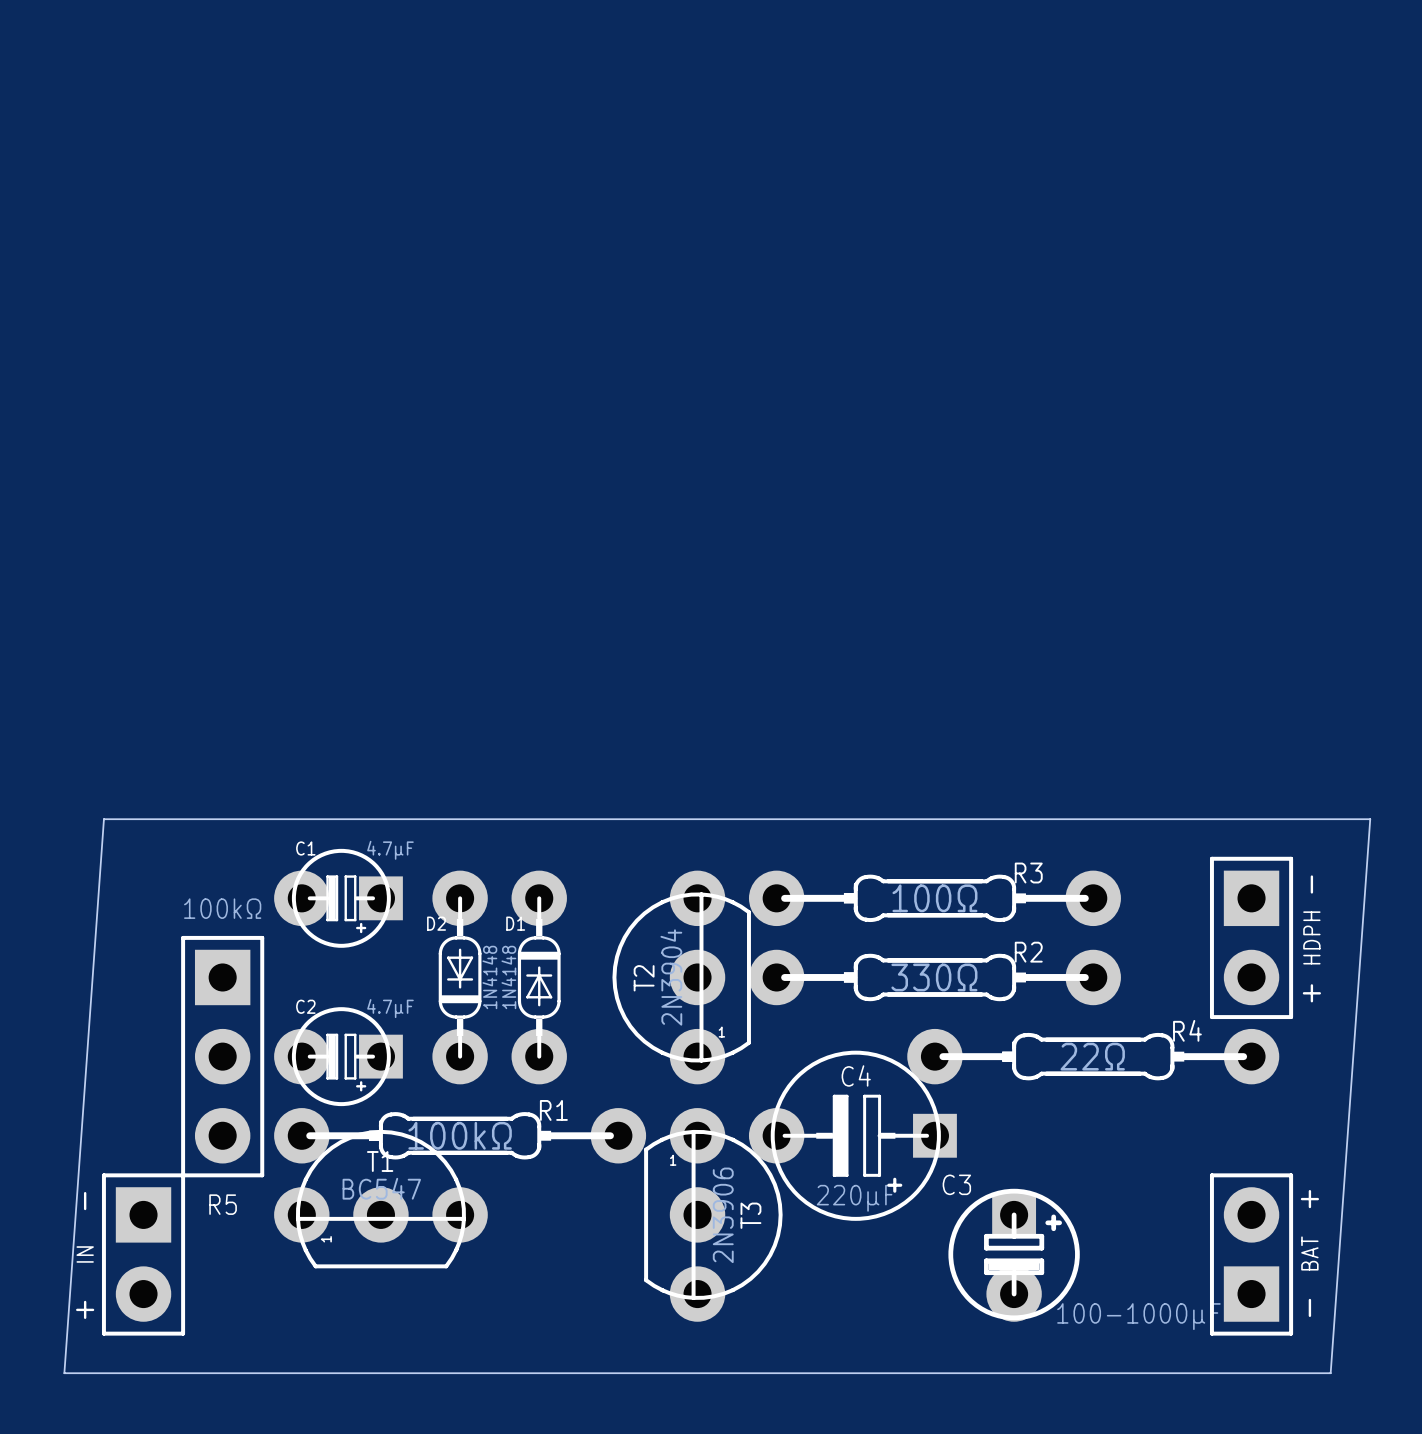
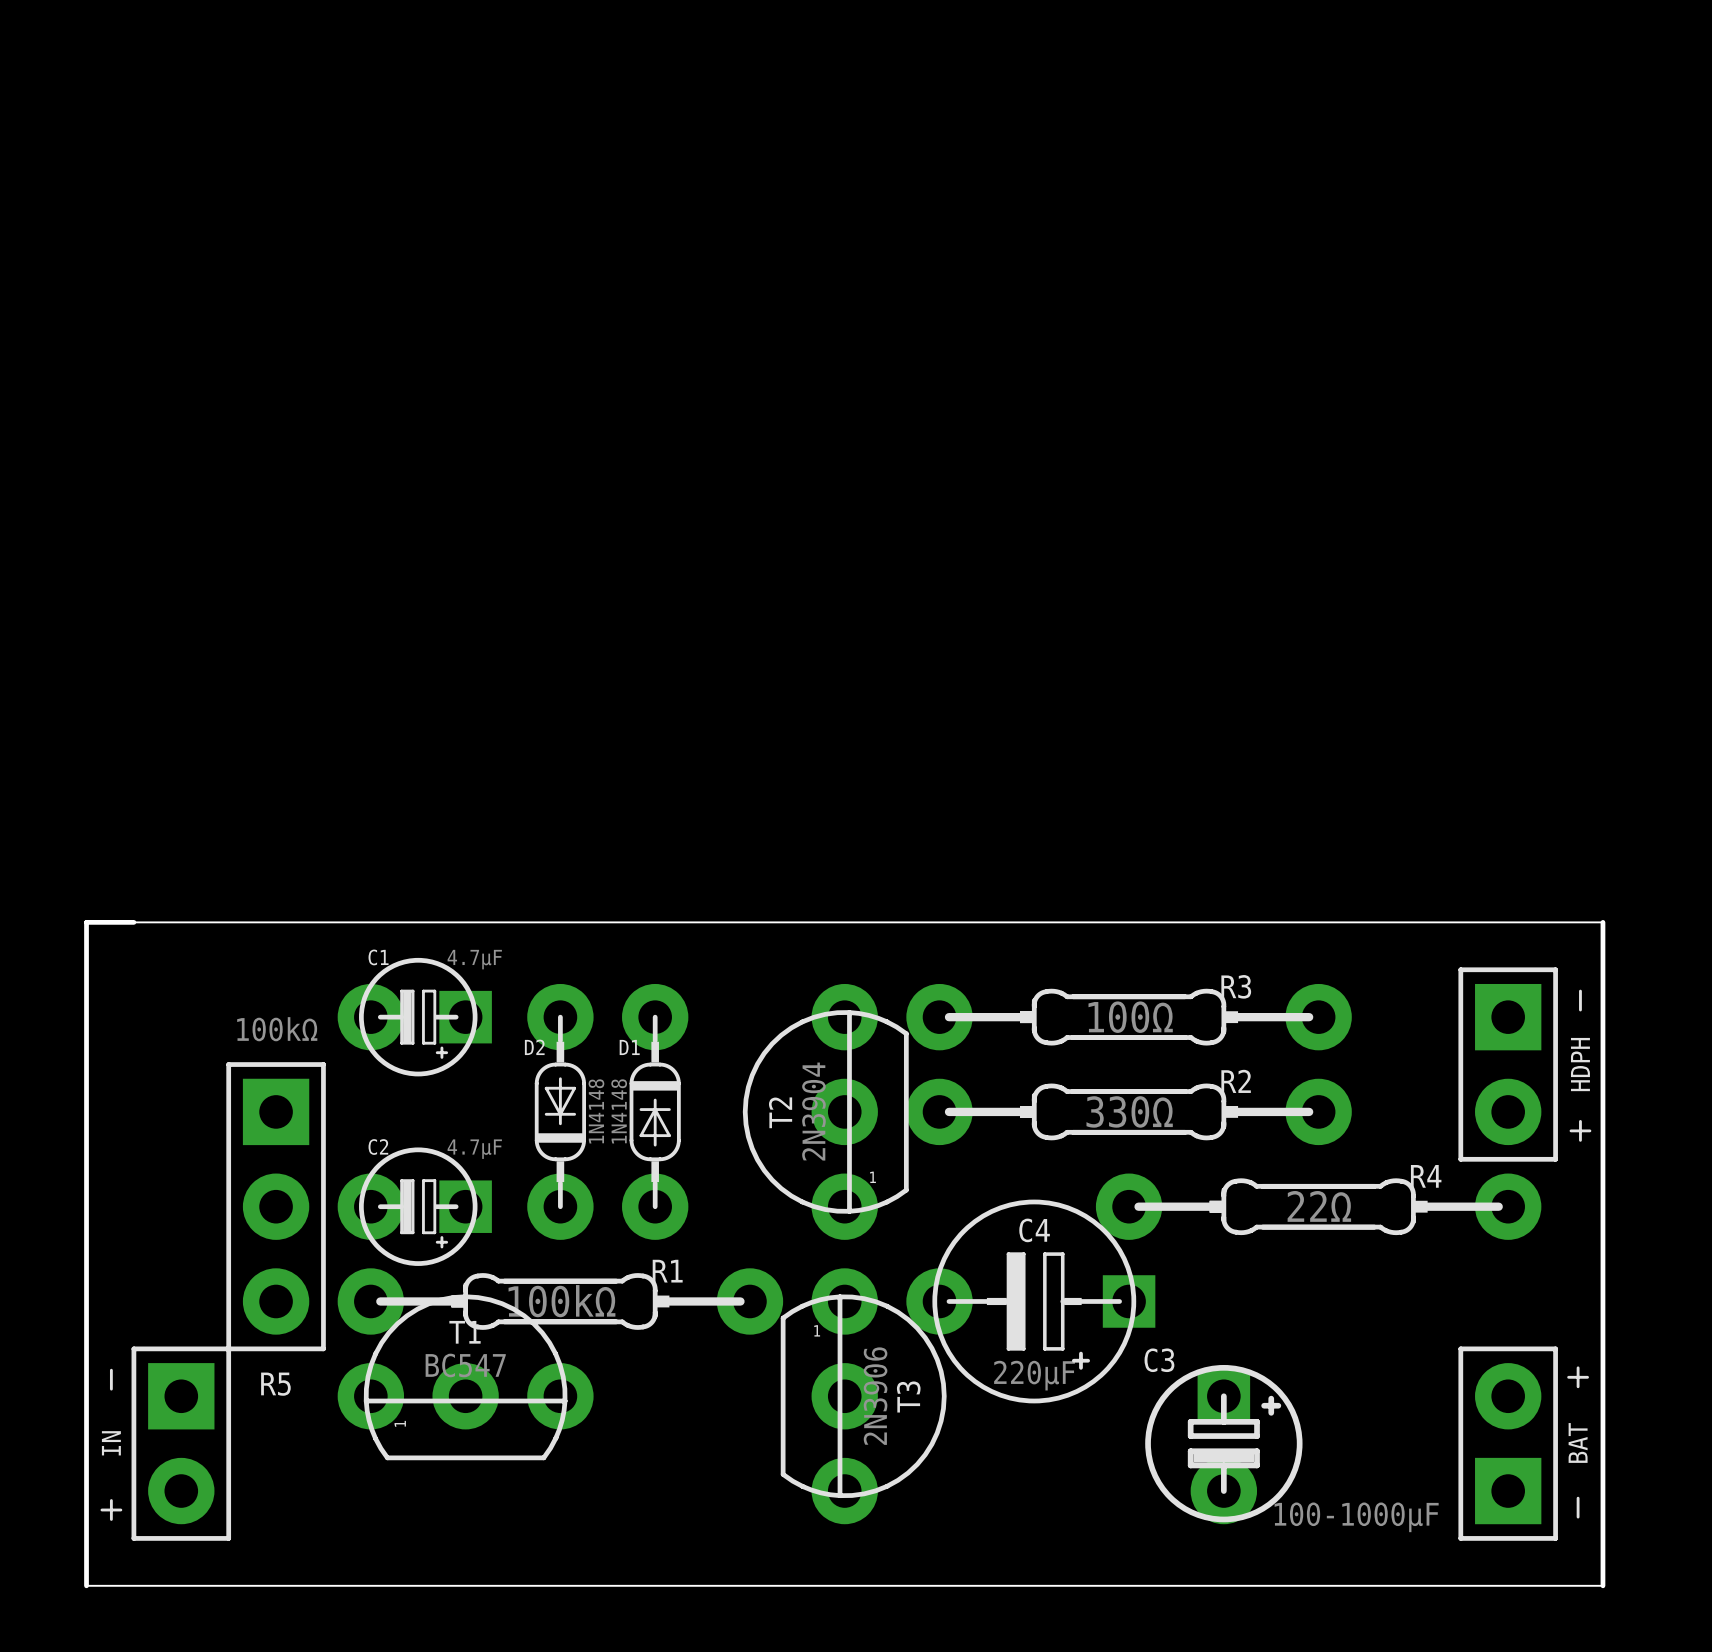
board edge: (103, 819) (64, 1373) -> (133, 922) (86, 922) (86, 1585)
board edge: (1330, 819) (1370, 819) (1330, 1373) -> (1602, 922) (1602, 1585)

